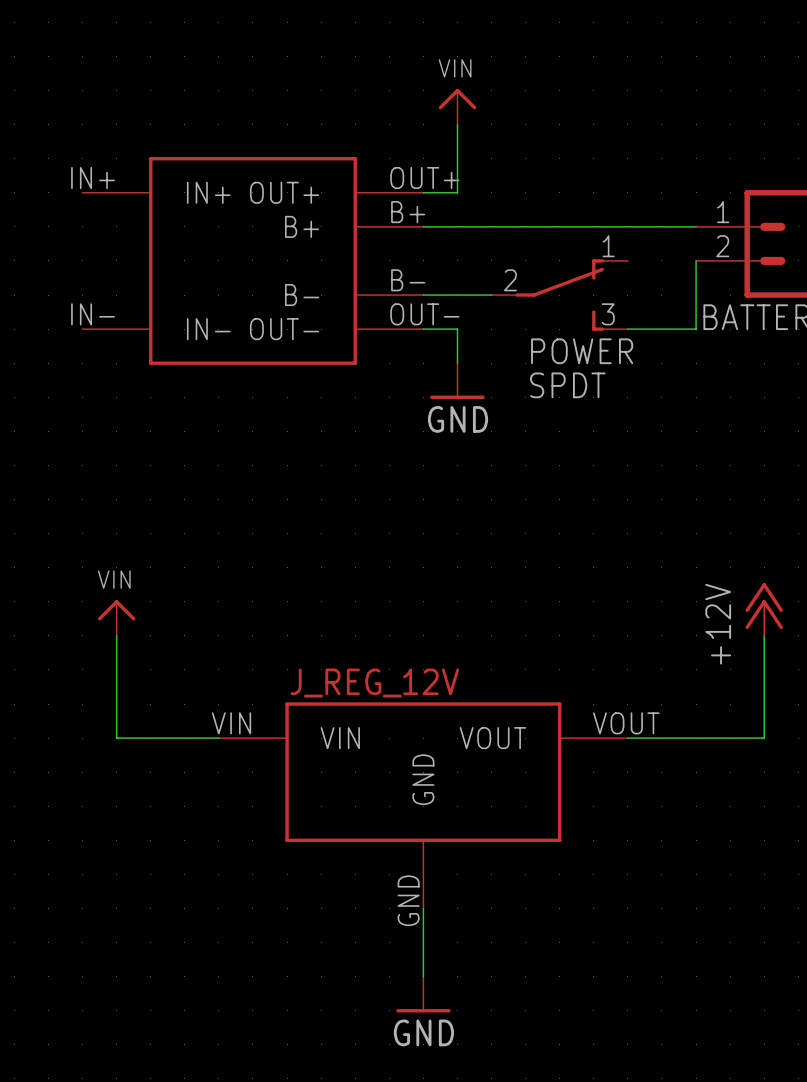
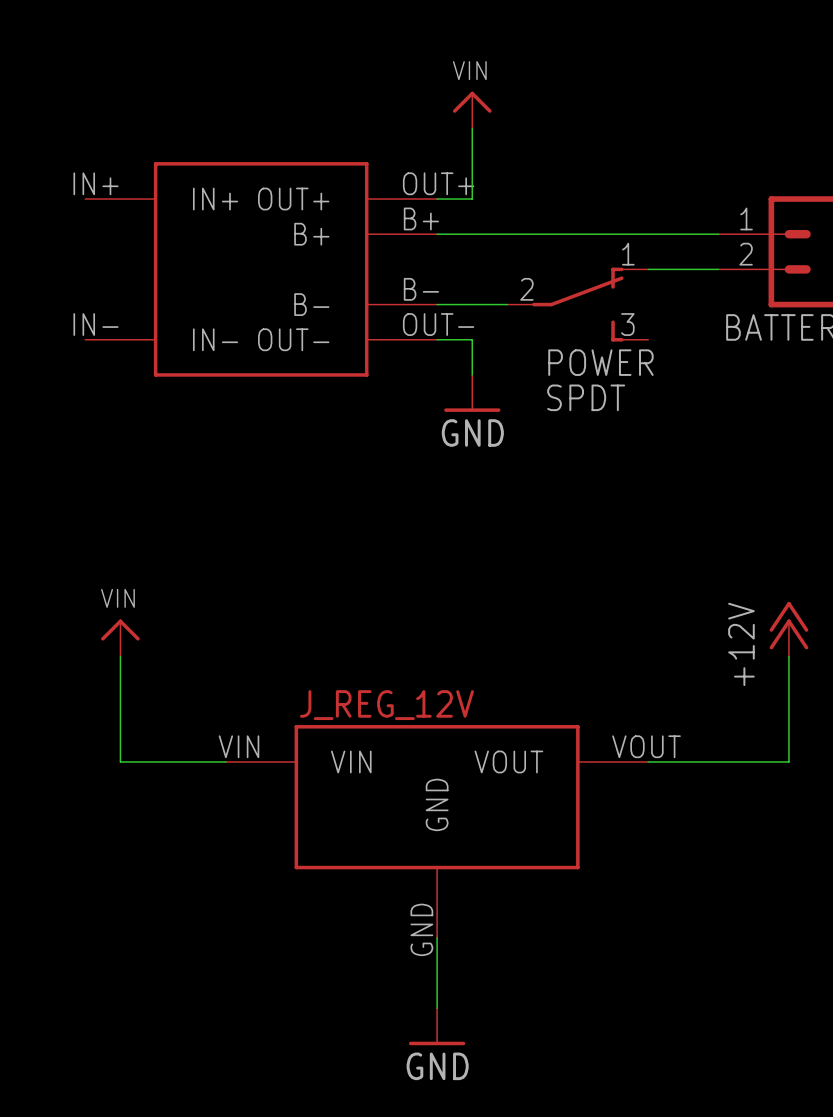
wire: (696, 260) (696, 329) (627, 329) -> (718, 269) (648, 269)

